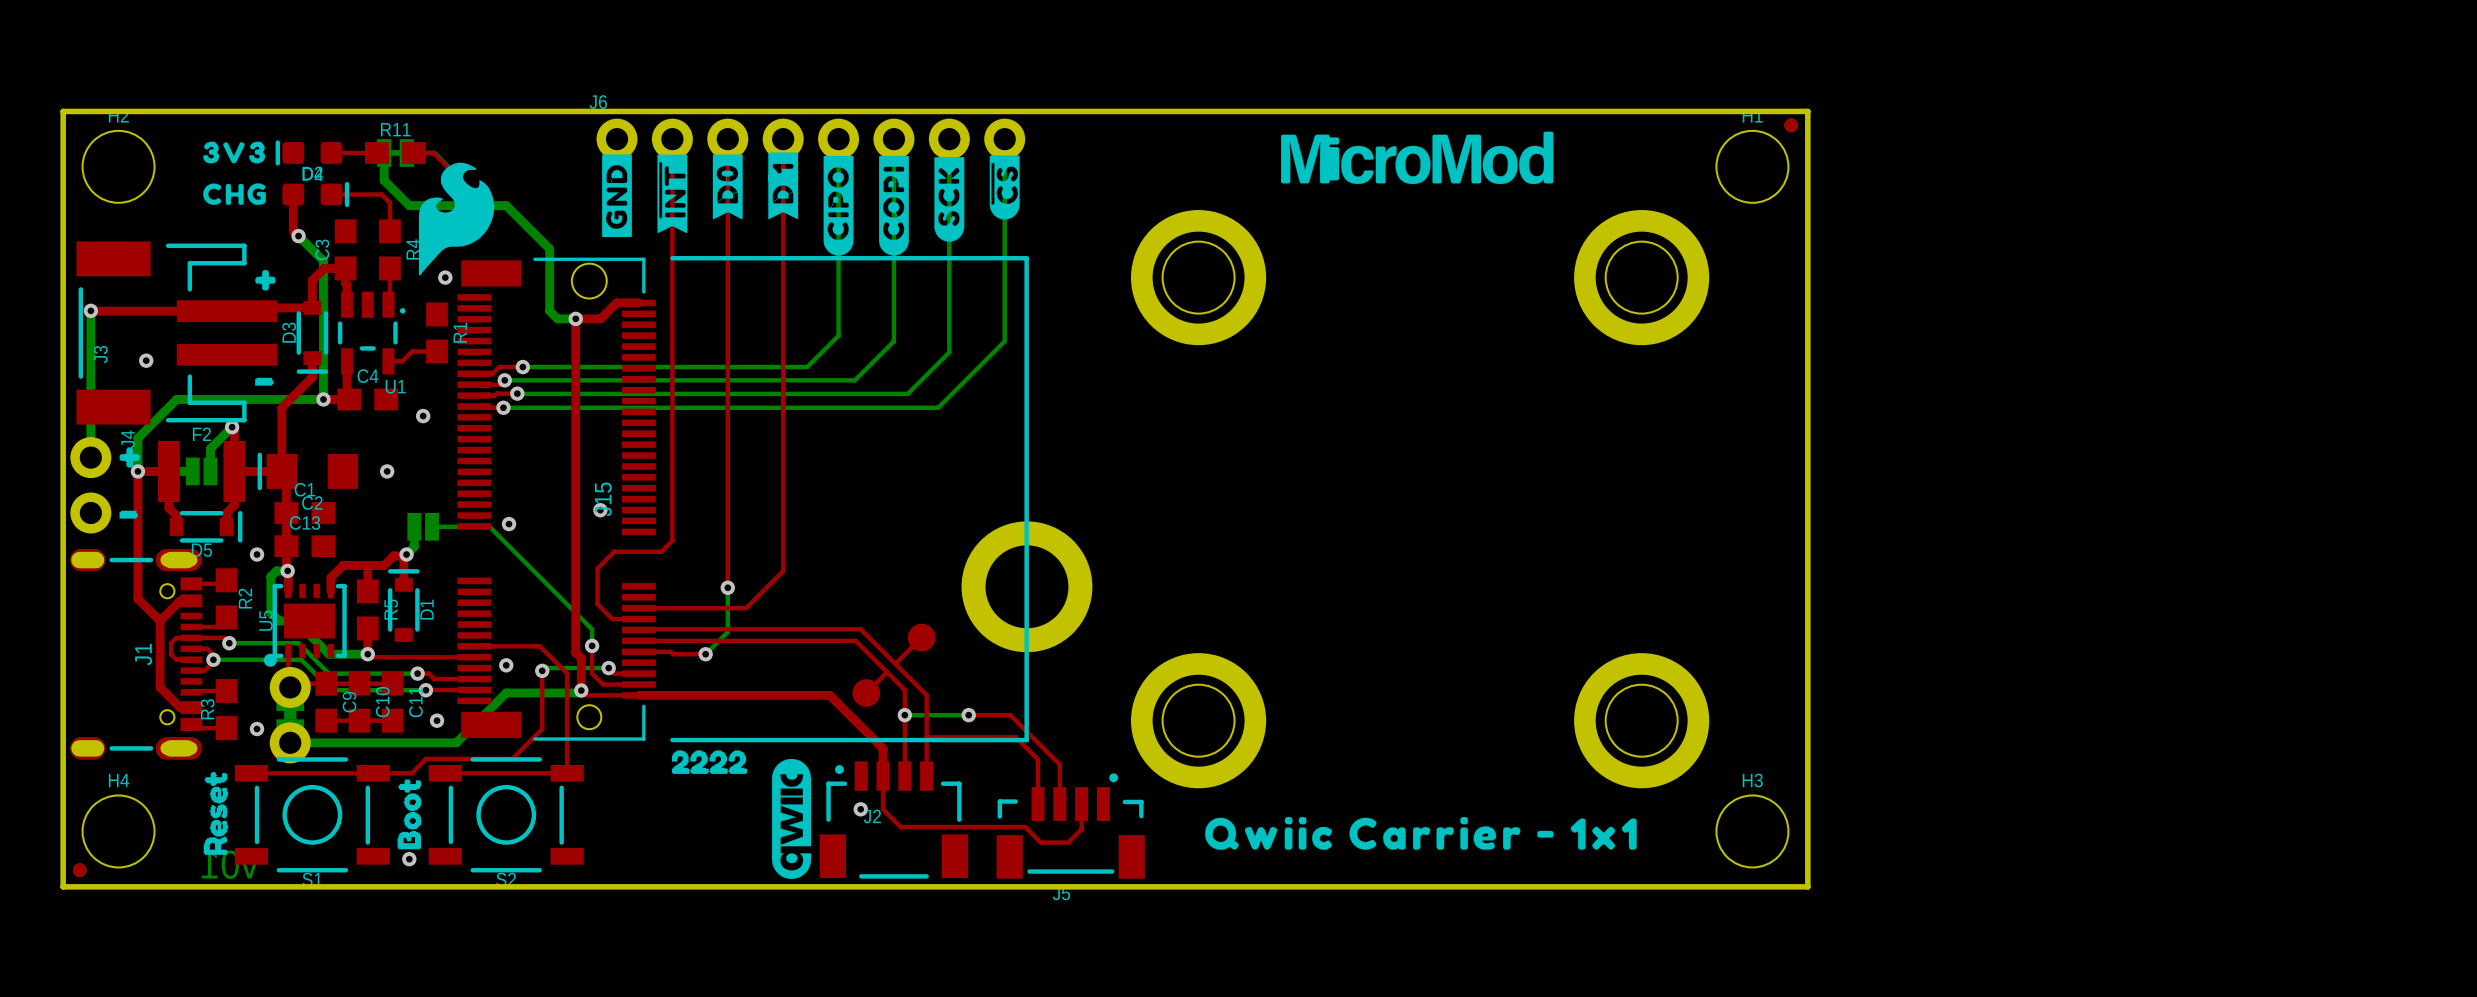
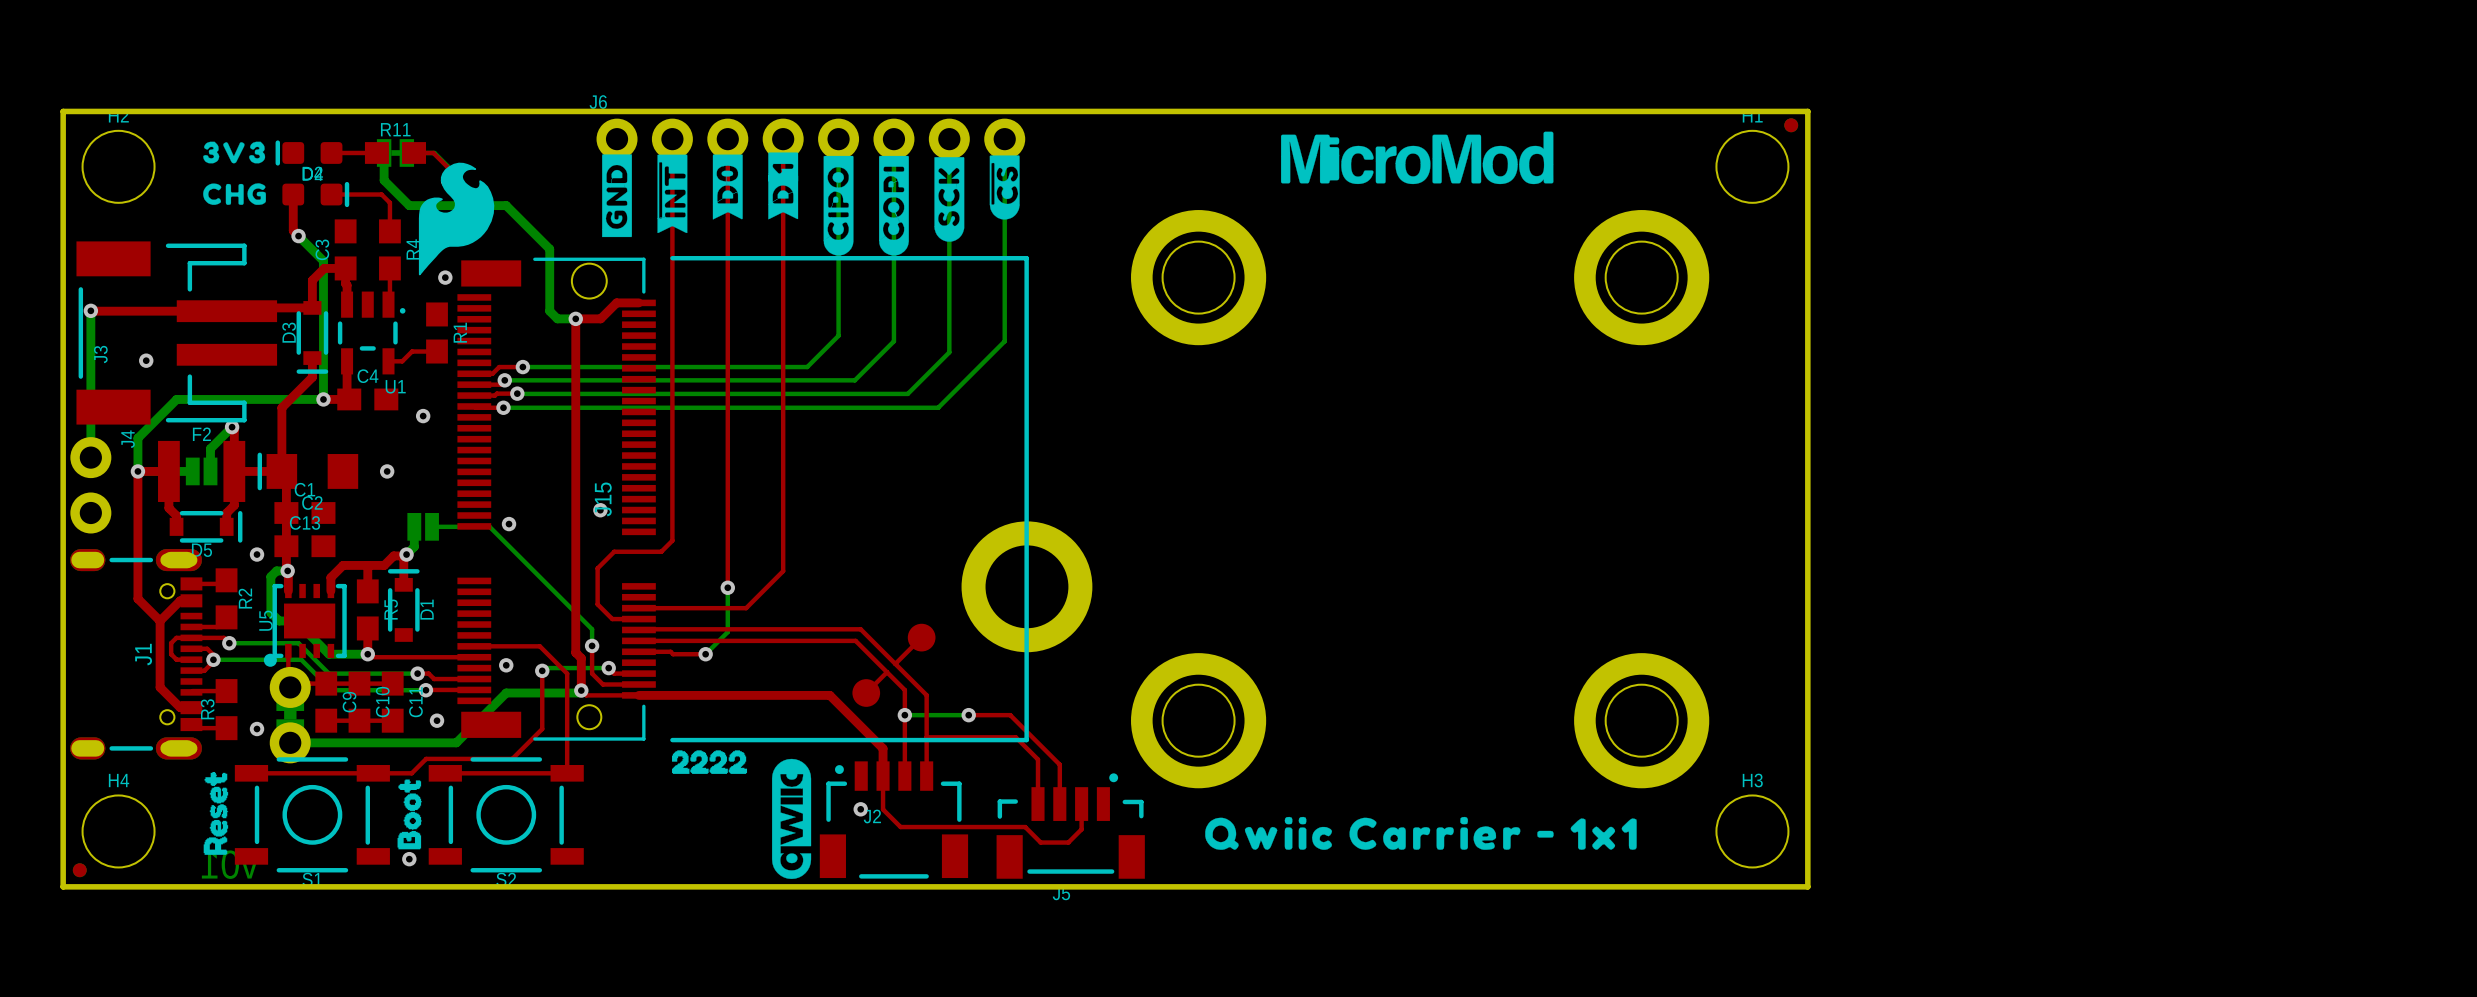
drawing: [255, 270, 276, 291] -> none
drawing: [255, 377, 274, 386] -> none
drawing: [119, 447, 140, 468] -> none
drawing: [119, 510, 138, 519] -> none

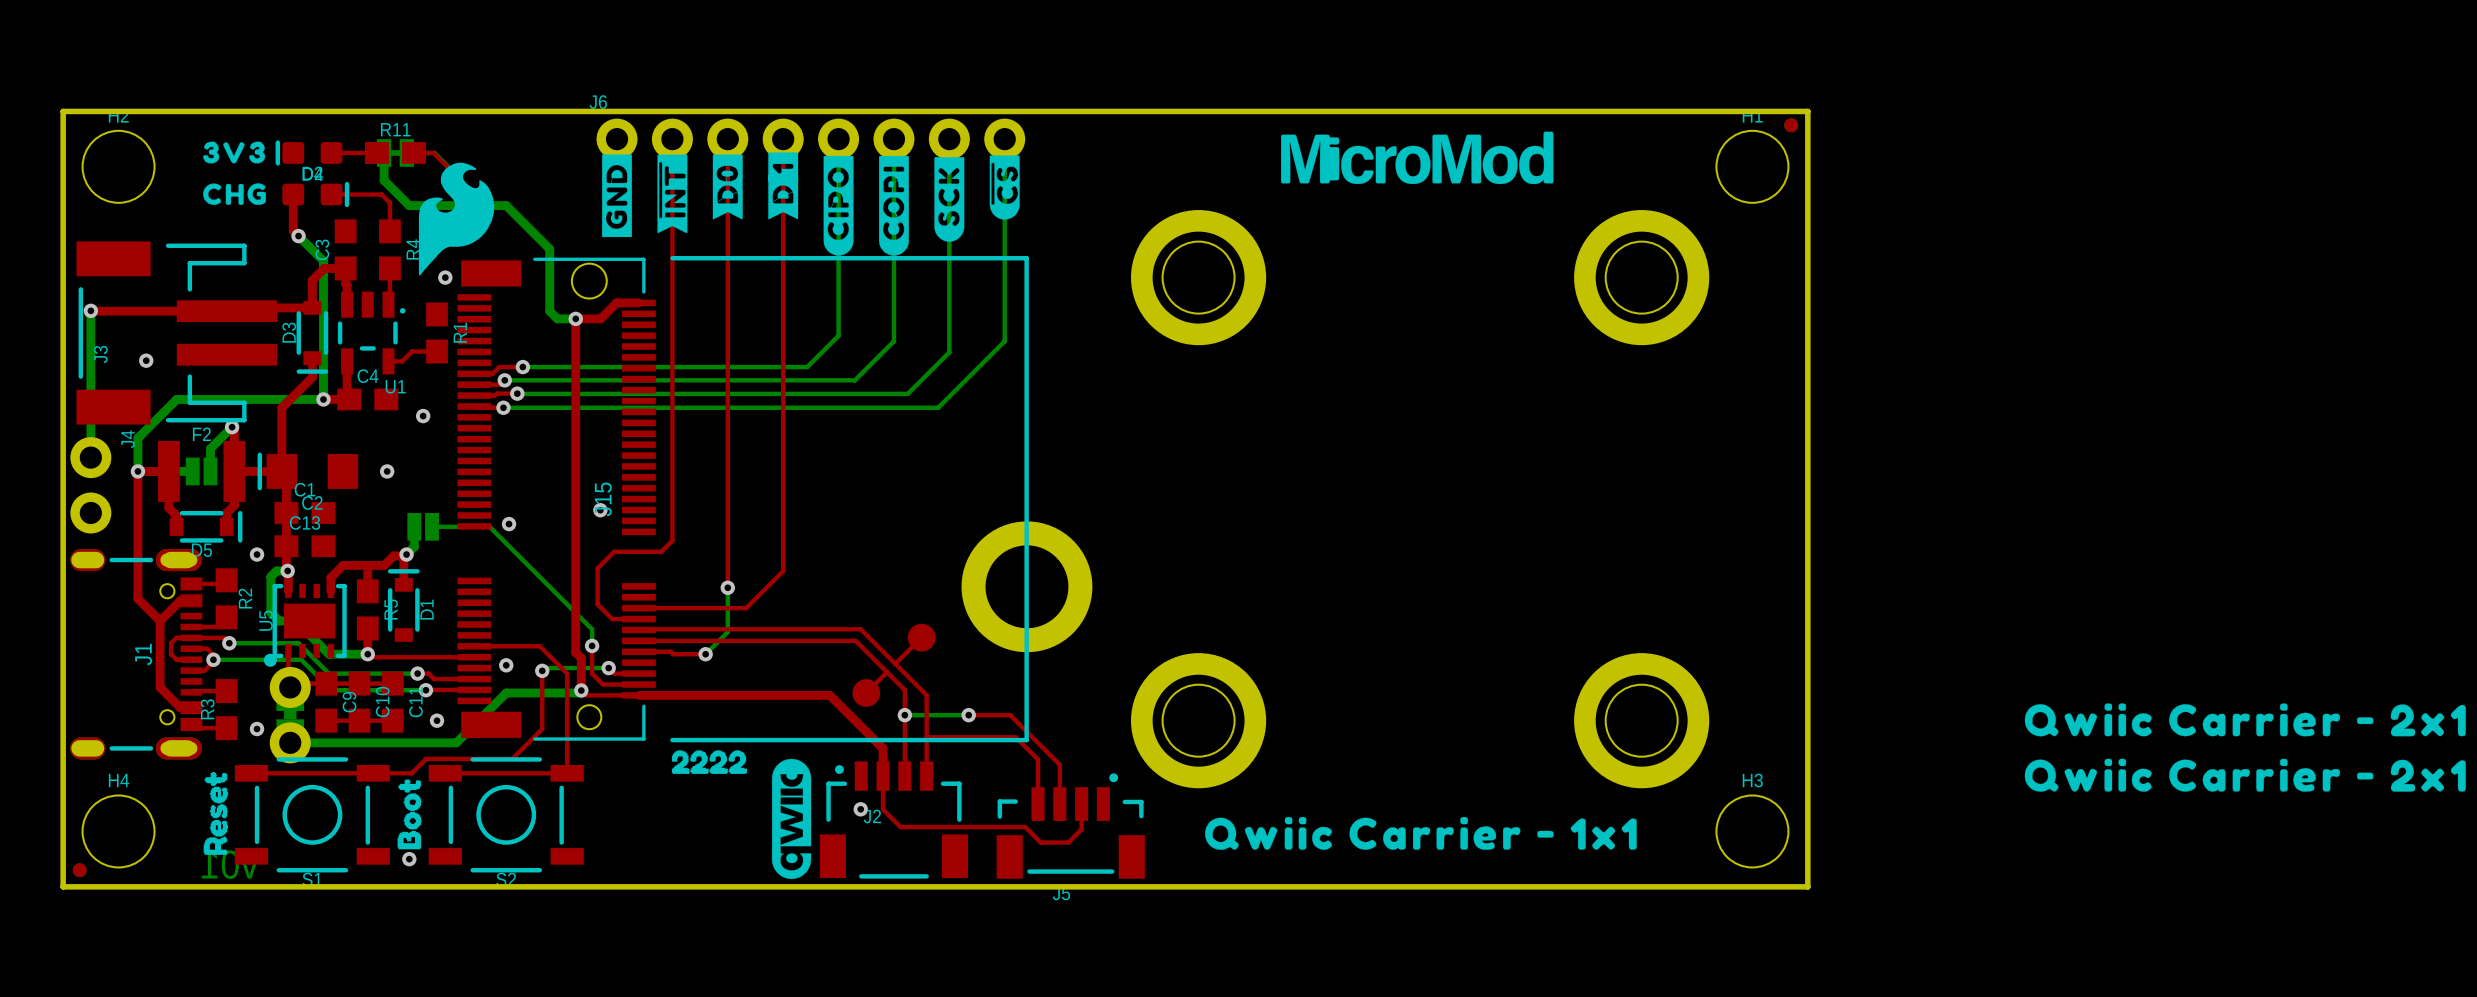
drawing: none -> [2024, 703, 2466, 792]

